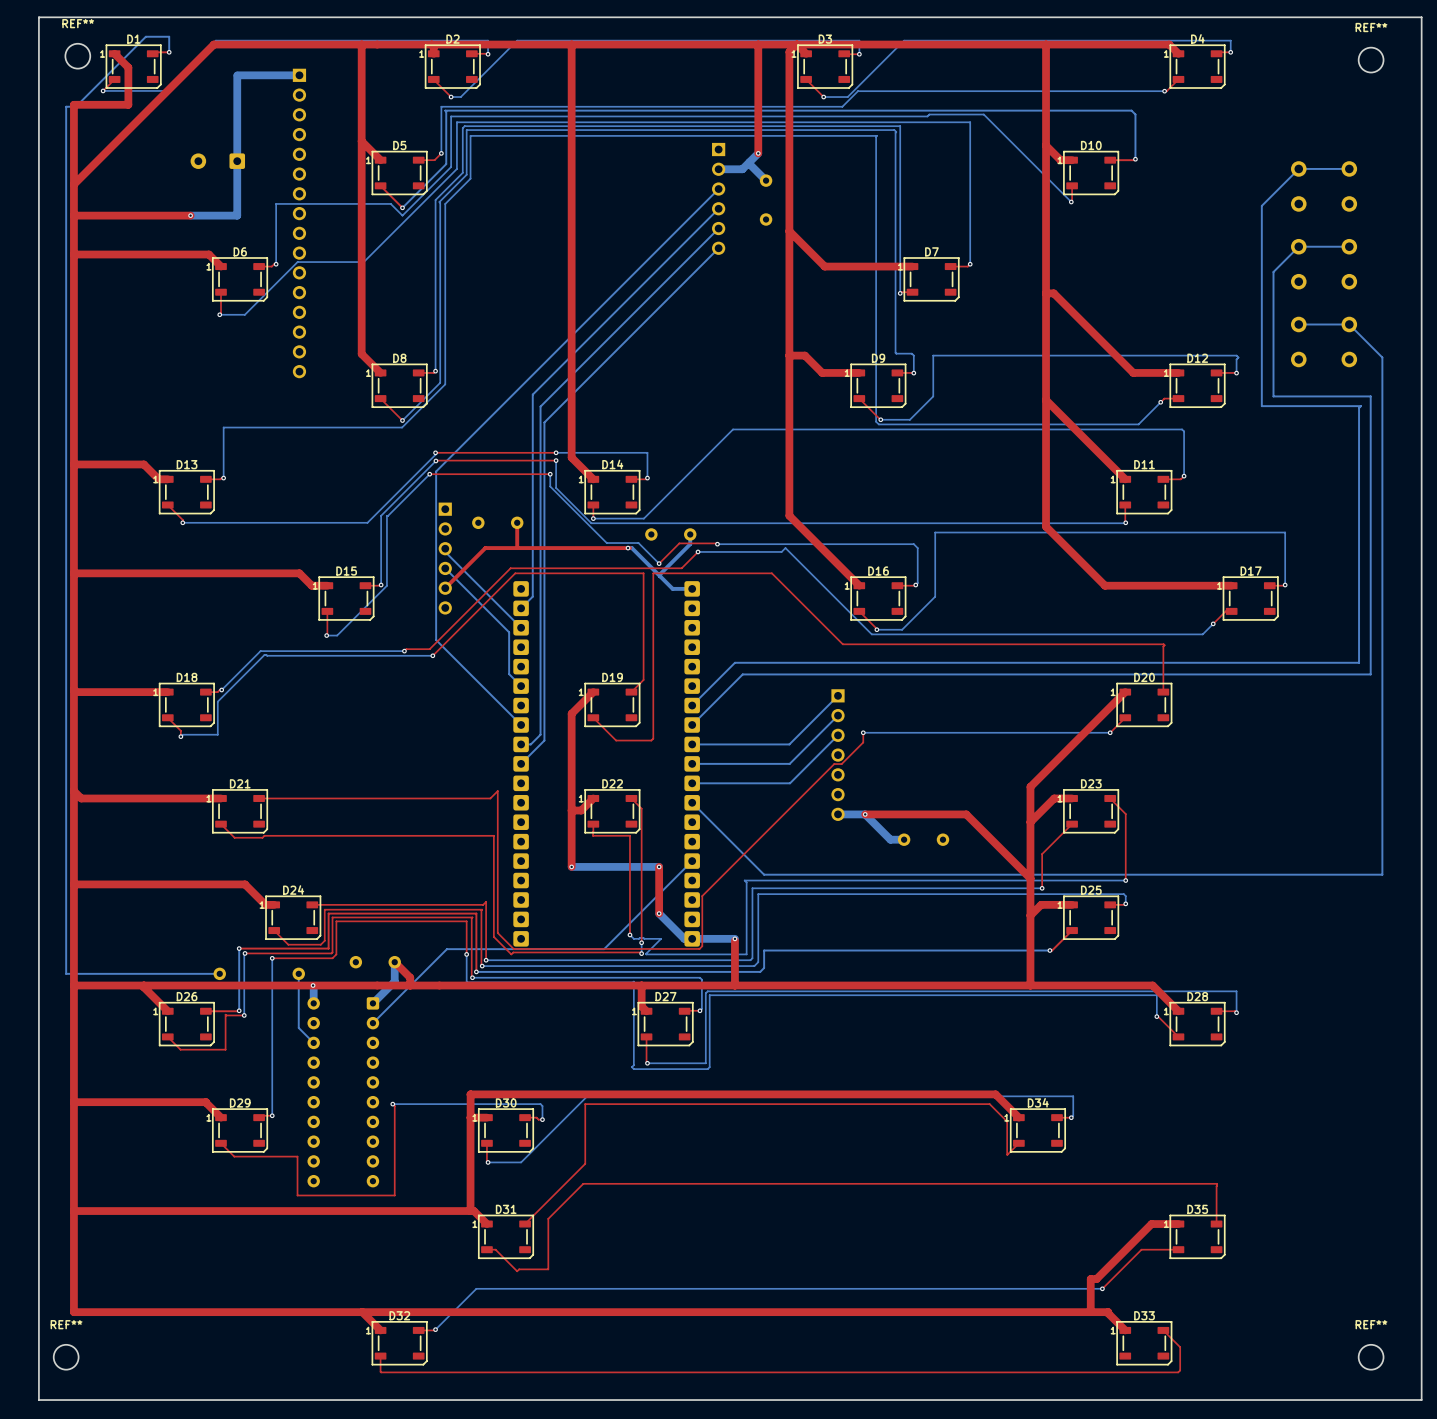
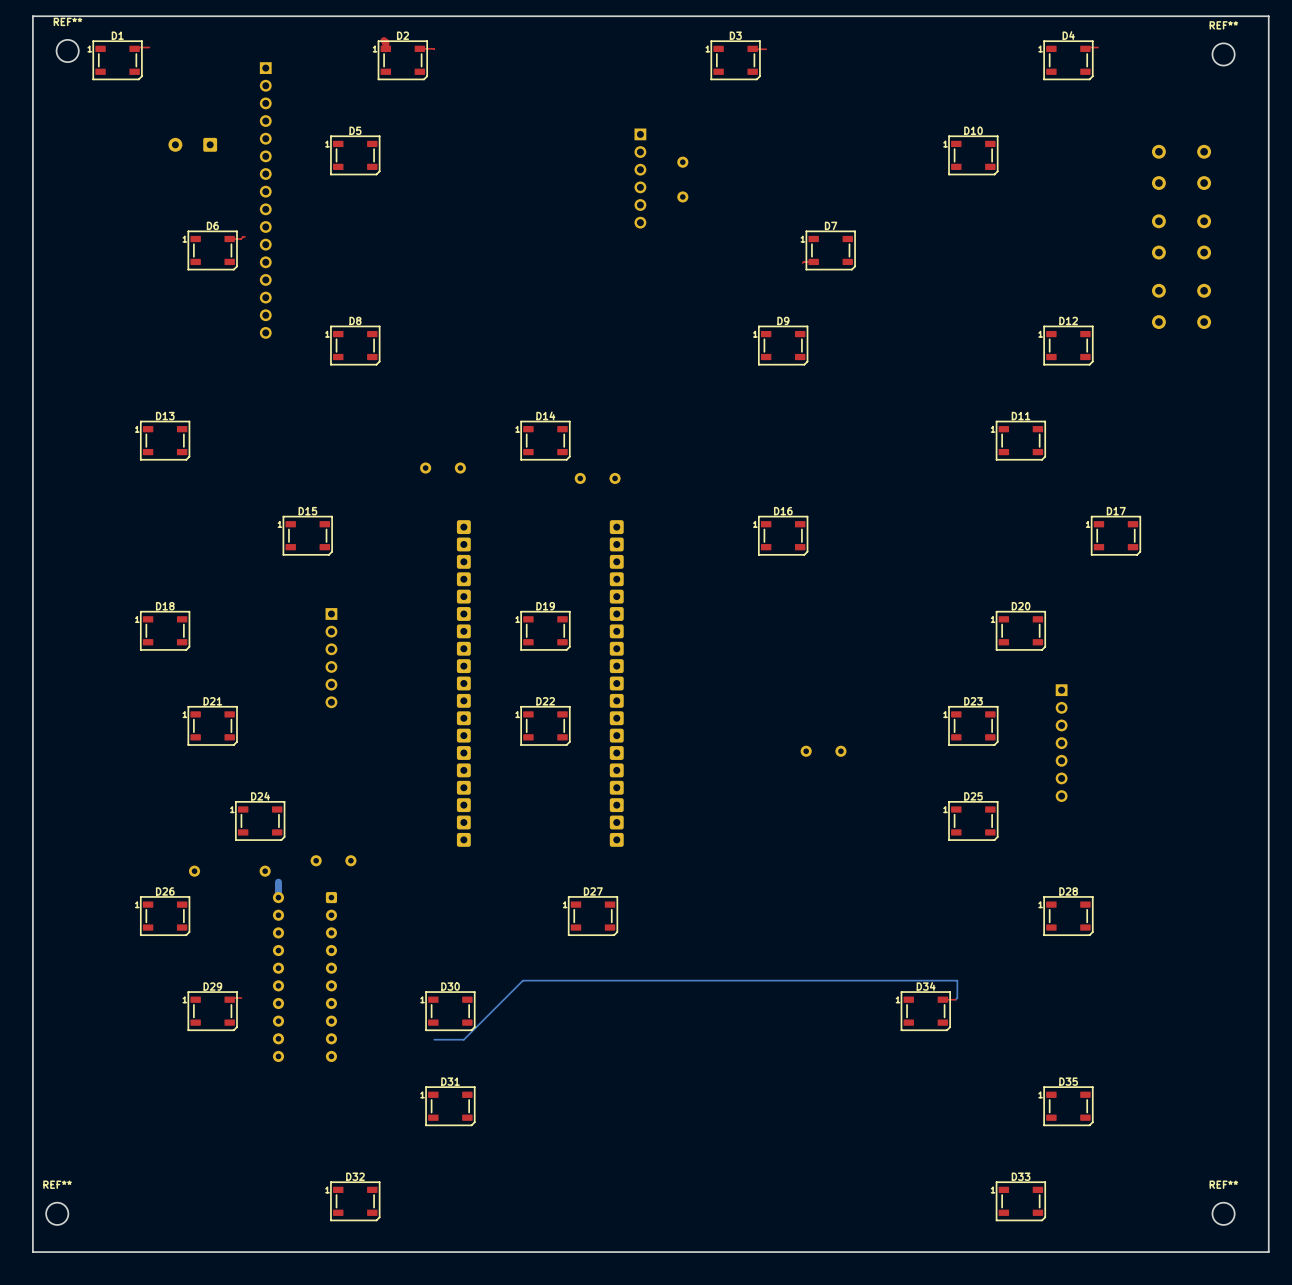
top track: (361, 44) (361, 354) (380, 372) -> none
top track: (571, 44) (571, 457) (593, 479) -> none
top track: (758, 44) (758, 153) -> none
top track: (1046, 44) (1046, 526) (1105, 585) (1231, 585) -> none
bottom track: (169, 52) (169, 36) (145, 36) (75, 106) (66, 106) (66, 973) (219, 973) -> none
via: (169, 52) -> none
bottom track: (1230, 52) (1230, 40) (904, 40) (847, 97) (823, 97) -> none
via: (1230, 52) -> none
top track: (114, 53) (128, 67) (128, 104) (73, 104) (73, 1312) (1108, 1312) (1125, 1330) -> none
top track: (806, 53) (796, 44) (789, 51) (789, 515) (859, 585) -> none
top track: (1178, 53) (1169, 44) (213, 44) (73, 184) -> none
bottom track: (488, 54) (488, 40) (215, 40) (165, 91) (103, 90) -> none
via: (488, 54) -> none
bottom track: (859, 54) (859, 40) (517, 40) (460, 97) (451, 97) -> none
via: (859, 54) -> none
bottom track: (299, 75) (237, 75) (237, 215) (190, 215) -> none
top track: (114, 79) (103, 91) -> none
top track: (433, 79) (451, 97) -> none
top track: (806, 79) (824, 97) -> none
top track: (1178, 79) (1164, 91) -> none
via: (103, 90) -> none
bottom track: (1164, 91) (857, 91) (842, 106) (441, 106) (441, 153) -> none
via: (1164, 91) -> none
via: (451, 97) -> none
via: (823, 97) -> none
top track: (361, 141) (380, 160) -> none
top track: (1046, 145) (1060, 160) (1072, 160) -> none
top track: (441, 153) (434, 160) (418, 160) -> none
via: (441, 153) -> none
bottom track: (758, 153) (742, 169) (718, 169) -> none
via: (758, 153) -> none
top track: (1135, 159) (1110, 160) -> none
bottom track: (1135, 159) (1135, 114) (1131, 110) (445, 110) (446, 164) (402, 207) -> none
via: (1135, 159) -> none
bottom track: (749, 162) (766, 180) -> none
bottom track: (1349, 168) (1298, 168) (1261, 205) (1261, 406) (1360, 406) (1359, 408) (1359, 662) (734, 662) (692, 705) -> none
top track: (380, 185) (402, 207) -> none
top track: (1072, 185) (1071, 202) -> none
bottom track: (718, 189) (436, 471) (436, 640) (521, 724) -> none
bottom track: (1071, 202) (983, 114) (929, 114) (927, 116) (451, 116) (451, 167) (402, 215) (390, 203) (276, 203) (276, 264) -> none
via: (1071, 202) -> none
via: (402, 207) -> none
bottom track: (718, 208) (532, 394) (532, 596) (521, 608) -> none
top track: (73, 215) (190, 215) -> none
via: (190, 215) -> none
bottom track: (718, 228) (540, 406) (540, 734) (530, 744) (521, 744) -> none
top track: (789, 231) (824, 266) (912, 266) -> none
bottom track: (1349, 246) (1298, 246) (1273, 272) (1273, 396) (1370, 396) (1370, 674) (742, 674) (692, 724) -> none
bottom track: (718, 248) (544, 422) (544, 740) (521, 763) -> none
top track: (73, 254) (208, 254) (220, 266) -> none
via: (276, 264) -> none
top track: (970, 264) (967, 266) (950, 266) -> none
bottom track: (970, 264) (970, 122) (456, 122) (456, 168) (363, 262) (297, 262) (244, 314) (219, 314) -> none
via: (970, 264) -> none
top track: (220, 292) (219, 314) -> none
bottom track: (900, 293) (900, 126) (464, 126) (462, 128) (462, 172) (435, 200) (435, 371) -> none
via: (900, 293) -> none
top track: (1046, 293) (1053, 293) (1133, 372) (1178, 372) -> none
via: (219, 314) -> none
bottom track: (1298, 324) (1349, 324) (1382, 357) (1382, 874) (764, 874) (692, 802) -> none
top track: (789, 355) (804, 355) (822, 372) (859, 372) -> none
top track: (435, 371) (433, 372) (418, 372) -> none
via: (435, 371) -> none
top track: (897, 372) (913, 373) -> none
top track: (1216, 372) (1236, 373) -> none
bottom track: (913, 373) (913, 355) (911, 353) (895, 352) (896, 132) (894, 130) (466, 130) (466, 174) (439, 202) (440, 382) (402, 420) -> none
via: (913, 373) -> none
bottom track: (1236, 373) (1236, 359) (1238, 357) (1236, 355) (933, 355) (933, 396) (909, 419) (880, 419) -> none
via: (1236, 373) -> none
top track: (380, 398) (402, 420) -> none
top track: (859, 398) (880, 419) -> none
top track: (1178, 398) (1164, 398) (1160, 402) -> none
top track: (1046, 400) (1125, 479) -> none
bottom track: (1160, 402) (1138, 424) (878, 424) (876, 421) (876, 135) (470, 135) (470, 178) (445, 203) (445, 384) (402, 427) (223, 427) (223, 478) -> none
via: (1160, 402) -> none
via: (880, 419) -> none
via: (402, 420) -> none
top track: (435, 452) (556, 452) -> none
bottom track: (435, 452) (367, 522) (182, 522) -> none
via: (435, 452) -> none
bottom track: (556, 452) (647, 452) (647, 478) -> none
via: (556, 452) -> none
bottom track: (435, 460) (381, 515) (381, 585) -> none
via: (435, 460) -> none
top track: (556, 460) (435, 460) -> none
bottom track: (556, 460) (556, 487) (591, 523) (1125, 522) -> none
via: (556, 460) -> none
top track: (73, 464) (143, 464) (158, 479) (167, 479) -> none
top track: (429, 474) (550, 474) -> none
bottom track: (429, 474) (386, 516) (386, 585) (337, 635) (326, 635) -> none
via: (429, 474) -> none
bottom track: (550, 474) (550, 486) (606, 543) (638, 543) (659, 563) -> none
via: (550, 474) -> none
top track: (1184, 476) (1180, 479) (1163, 479) -> none
bottom track: (1184, 476) (1184, 431) (1182, 429) (733, 429) (643, 518) (593, 518) -> none
via: (1184, 476) -> none
top track: (223, 478) (205, 479) -> none
via: (223, 478) -> none
top track: (647, 478) (631, 479) -> none
via: (647, 478) -> none
top track: (167, 504) (182, 520) (182, 522) -> none
top track: (593, 504) (593, 518) -> none
top track: (1125, 504) (1125, 522) -> none
via: (593, 518) -> none
via: (182, 522) -> none
top track: (517, 522) (517, 548) -> none
via: (1125, 522) -> none
bottom track: (690, 534) (690, 544) (660, 576) -> none
top track: (717, 544) (679, 543) (659, 563) -> none
bottom track: (717, 544) (913, 544) (917, 548) (917, 583) (915, 585) -> none
via: (717, 544) -> none
bottom track: (445, 548) (445, 551) (521, 627) -> none
via: (628, 548) -> none
top track: (629, 548) (485, 548) (445, 588) -> none
bottom track: (629, 548) (672, 588) (692, 588) -> none
top track: (698, 551) (681, 568) (510, 568) (429, 649) (406, 649) (404, 651) -> none
bottom track: (698, 551) (781, 551) (785, 548) (871, 634) (1202, 634) (1213, 623) -> none
via: (698, 551) -> none
part position: (445, 558) -> (331, 658)
via: (659, 563) -> none
bottom track: (445, 568) (509, 632) (509, 674) (521, 686) -> none
top track: (73, 573) (299, 573) (311, 585) (327, 585) -> none
top track: (381, 585) (365, 585) -> none
via: (381, 585) -> none
top track: (915, 585) (897, 585) -> none
via: (915, 585) -> none
top track: (1285, 585) (1269, 585) -> none
bottom track: (1285, 585) (1285, 532) (935, 532) (935, 596) (902, 629) (876, 629) -> none
via: (1285, 585) -> none
top track: (327, 611) (326, 635) -> none
top track: (859, 611) (876, 629) -> none
top track: (1231, 611) (1225, 611) (1213, 623) -> none
via: (1213, 623) -> none
via: (876, 629) -> none
via: (326, 635) -> none
bottom track: (404, 651) (260, 651) (221, 690) -> none
via: (404, 651) -> none
top track: (432, 655) (515, 573) (643, 573) (643, 679) (631, 692) -> none
bottom track: (432, 655) (264, 655) (217, 701) (217, 734) (182, 734) (180, 736) -> none
via: (432, 655) -> none
top track: (73, 690) (76, 692) (167, 692) -> none
top track: (221, 690) (217, 692) (205, 692) -> none
via: (221, 690) -> none
top track: (593, 692) (571, 713) (571, 866) -> none
top track: (1125, 692) (1030, 786) (1030, 985) -> none
top track: (1163, 692) (1163, 644) (842, 644) (771, 573) (653, 573) (653, 738) (651, 740) (616, 740) (593, 717) -> none
bottom track: (838, 695) (789, 744) (692, 744) -> none
bottom track: (838, 715) (789, 763) (692, 763) -> none
top track: (167, 717) (180, 730) (180, 736) -> none
top track: (1125, 717) (1110, 732) -> none
top track: (863, 732) (863, 742) (841, 764) (834, 764) (702, 896) (702, 946) (699, 948) (513, 948) (497, 933) (497, 791) (490, 798) (259, 798) -> none
bottom track: (863, 732) (1110, 732) -> none
via: (863, 732) -> none
via: (1110, 732) -> none
bottom track: (838, 735) (790, 783) (692, 783) -> none
via: (180, 736) -> none
part: (838, 755) -> none
top track: (73, 791) (81, 798) (220, 798) -> none
top track: (593, 798) (581, 810) (571, 810) -> none
top track: (631, 798) (641, 808) (641, 942) -> none
top track: (1072, 798) (1054, 798) (1030, 822) -> none
top track: (1110, 798) (1125, 814) (1125, 880) -> none
bottom track: (838, 814) (865, 814) (890, 839) (904, 839) -> none
top track: (865, 814) (966, 814) (1030, 878) -> none
via: (865, 814) -> none
top track: (220, 824) (234, 837) (262, 837) (264, 835) (493, 835) (493, 936) (511, 954) (513, 952) (641, 953) -> none
top track: (593, 824) (593, 835) (629, 835) (629, 934) -> none
top track: (1072, 824) (1042, 854) (1042, 888) -> none
part: none -> (1061, 743)
bottom track: (692, 861) (604, 949) (446, 949) (372, 1023) -> none
bottom track: (571, 866) (659, 866) -> none
via: (571, 866) -> none
top track: (659, 866) (659, 913) -> none
via: (659, 866) -> none
bottom track: (1125, 880) (744, 880) (746, 882) (746, 954) (646, 954) (661, 938) (633, 938) (629, 934) -> none
via: (1125, 880) -> none
top track: (73, 884) (245, 884) (265, 904) (274, 904) -> none
bottom track: (1042, 888) (752, 888) (752, 958) (750, 960) (486, 960) -> none
via: (1042, 888) -> none
top track: (1125, 903) (1110, 904) -> none
bottom track: (1125, 903) (1125, 896) (1123, 894) (758, 894) (758, 962) (754, 966) (482, 966) -> none
via: (1125, 903) -> none
top track: (312, 904) (483, 904) (486, 901) (486, 960) -> none
top track: (1072, 904) (1041, 904) (1030, 915) -> none
bottom track: (659, 913) (684, 938) (734, 938) -> none
via: (659, 913) -> none
top track: (274, 930) (288, 944) (320, 944) (324, 940) (324, 909) (482, 909) (482, 966) -> none
top track: (1067, 930) (1072, 930) (1049, 950) -> none
via: (629, 934) -> none
via: (734, 938) -> none
top track: (734, 940) (734, 985) -> none
bottom track: (641, 942) (641, 953) -> none
via: (641, 942) -> none
top track: (239, 948) (328, 948) (328, 913) (476, 913) (476, 971) -> none
bottom track: (239, 948) (239, 1010) -> none
via: (239, 948) -> none
bottom track: (1049, 950) (764, 950) (764, 968) (760, 971) (476, 971) -> none
via: (1049, 950) -> none
top track: (245, 953) (331, 953) (332, 917) (472, 917) (472, 977) -> none
bottom track: (245, 953) (244, 1015) -> none
via: (245, 953) -> none
via: (641, 953) -> none
top track: (466, 954) (466, 921) (336, 921) (336, 954) (332, 958) (272, 958) -> none
bottom track: (466, 954) (467, 982) (633, 981) (633, 1065) (631, 1067) (633, 1069) (707, 1069) (709, 1067) (709, 995) (1156, 995) (1156, 1016) -> none
via: (466, 954) -> none
bottom track: (272, 958) (272, 1115) -> none
via: (272, 958) -> none
via: (486, 960) -> none
top track: (394, 962) (410, 977) (410, 985) -> none
bottom track: (394, 962) (394, 981) (372, 1003) -> none
via: (482, 966) -> none
via: (476, 971) -> none
bottom track: (298, 973) (298, 1027) (313, 1042) -> none
bottom track: (472, 977) (699, 977) (701, 979) (701, 1008) (699, 1010) -> none
via: (472, 977) -> none
top track: (73, 985) (1152, 985) (1178, 1011) -> none
top track: (143, 985) (167, 1011) -> none
via: (313, 985) -> none
top track: (641, 985) (641, 1006) (646, 1011) -> none
top track: (239, 1010) (205, 1011) -> none
via: (239, 1010) -> none
top track: (699, 1010) (684, 1011) -> none
via: (699, 1010) -> none
top track: (1216, 1011) (1236, 1012) -> none
bottom track: (1236, 1012) (1236, 991) (707, 991) (705, 993) (705, 1063) (647, 1063) -> none
via: (1236, 1012) -> none
top track: (245, 1014) (225, 1014) (225, 1049) (180, 1049) (167, 1036) -> none
via: (244, 1015) -> none
top track: (1156, 1016) (1178, 1036) -> none
via: (1156, 1016) -> none
top track: (646, 1036) (647, 1063) -> none
via: (647, 1063) -> none
top track: (470, 1094) (995, 1094) (1018, 1117) -> none
top track: (470, 1094) (470, 1117) (486, 1117) -> none
top track: (73, 1102) (206, 1102) (220, 1117) -> none
top track: (392, 1104) (394, 1106) (394, 1195) (297, 1195) (297, 1156) (234, 1156) (220, 1143) -> none
bottom track: (392, 1104) (540, 1104) (542, 1106) (542, 1119) -> none
via: (392, 1104) -> none
via: (272, 1115) -> none
top track: (470, 1117) (470, 1211) -> none
top track: (525, 1117) (542, 1119) -> none
via: (1071, 1117) -> none
via: (542, 1119) -> none
top track: (486, 1143) (488, 1162) -> none
top track: (1018, 1143) (1007, 1154) (1007, 1121) (989, 1104) (585, 1104) (585, 1163) (525, 1224) -> none
via: (488, 1162) -> none
top track: (73, 1211) (473, 1211) (486, 1224) -> none
top track: (1178, 1224) (1151, 1224) (1096, 1279) (1090, 1279) (1090, 1312) -> none
top track: (1216, 1224) (1217, 1183) (583, 1183) (548, 1218) (548, 1269) (519, 1269) (517, 1271) (495, 1249) (486, 1249) -> none
top track: (1178, 1249) (1141, 1249) (1102, 1288) -> none
bottom track: (1102, 1288) (476, 1288) (435, 1329) -> none
via: (1102, 1288) -> none
top track: (362, 1312) (380, 1330) -> none
top track: (435, 1329) (418, 1330) -> none
via: (435, 1329) -> none
top track: (1163, 1330) (1180, 1347) (1180, 1370) (1178, 1372) (381, 1372) (380, 1356) -> none

